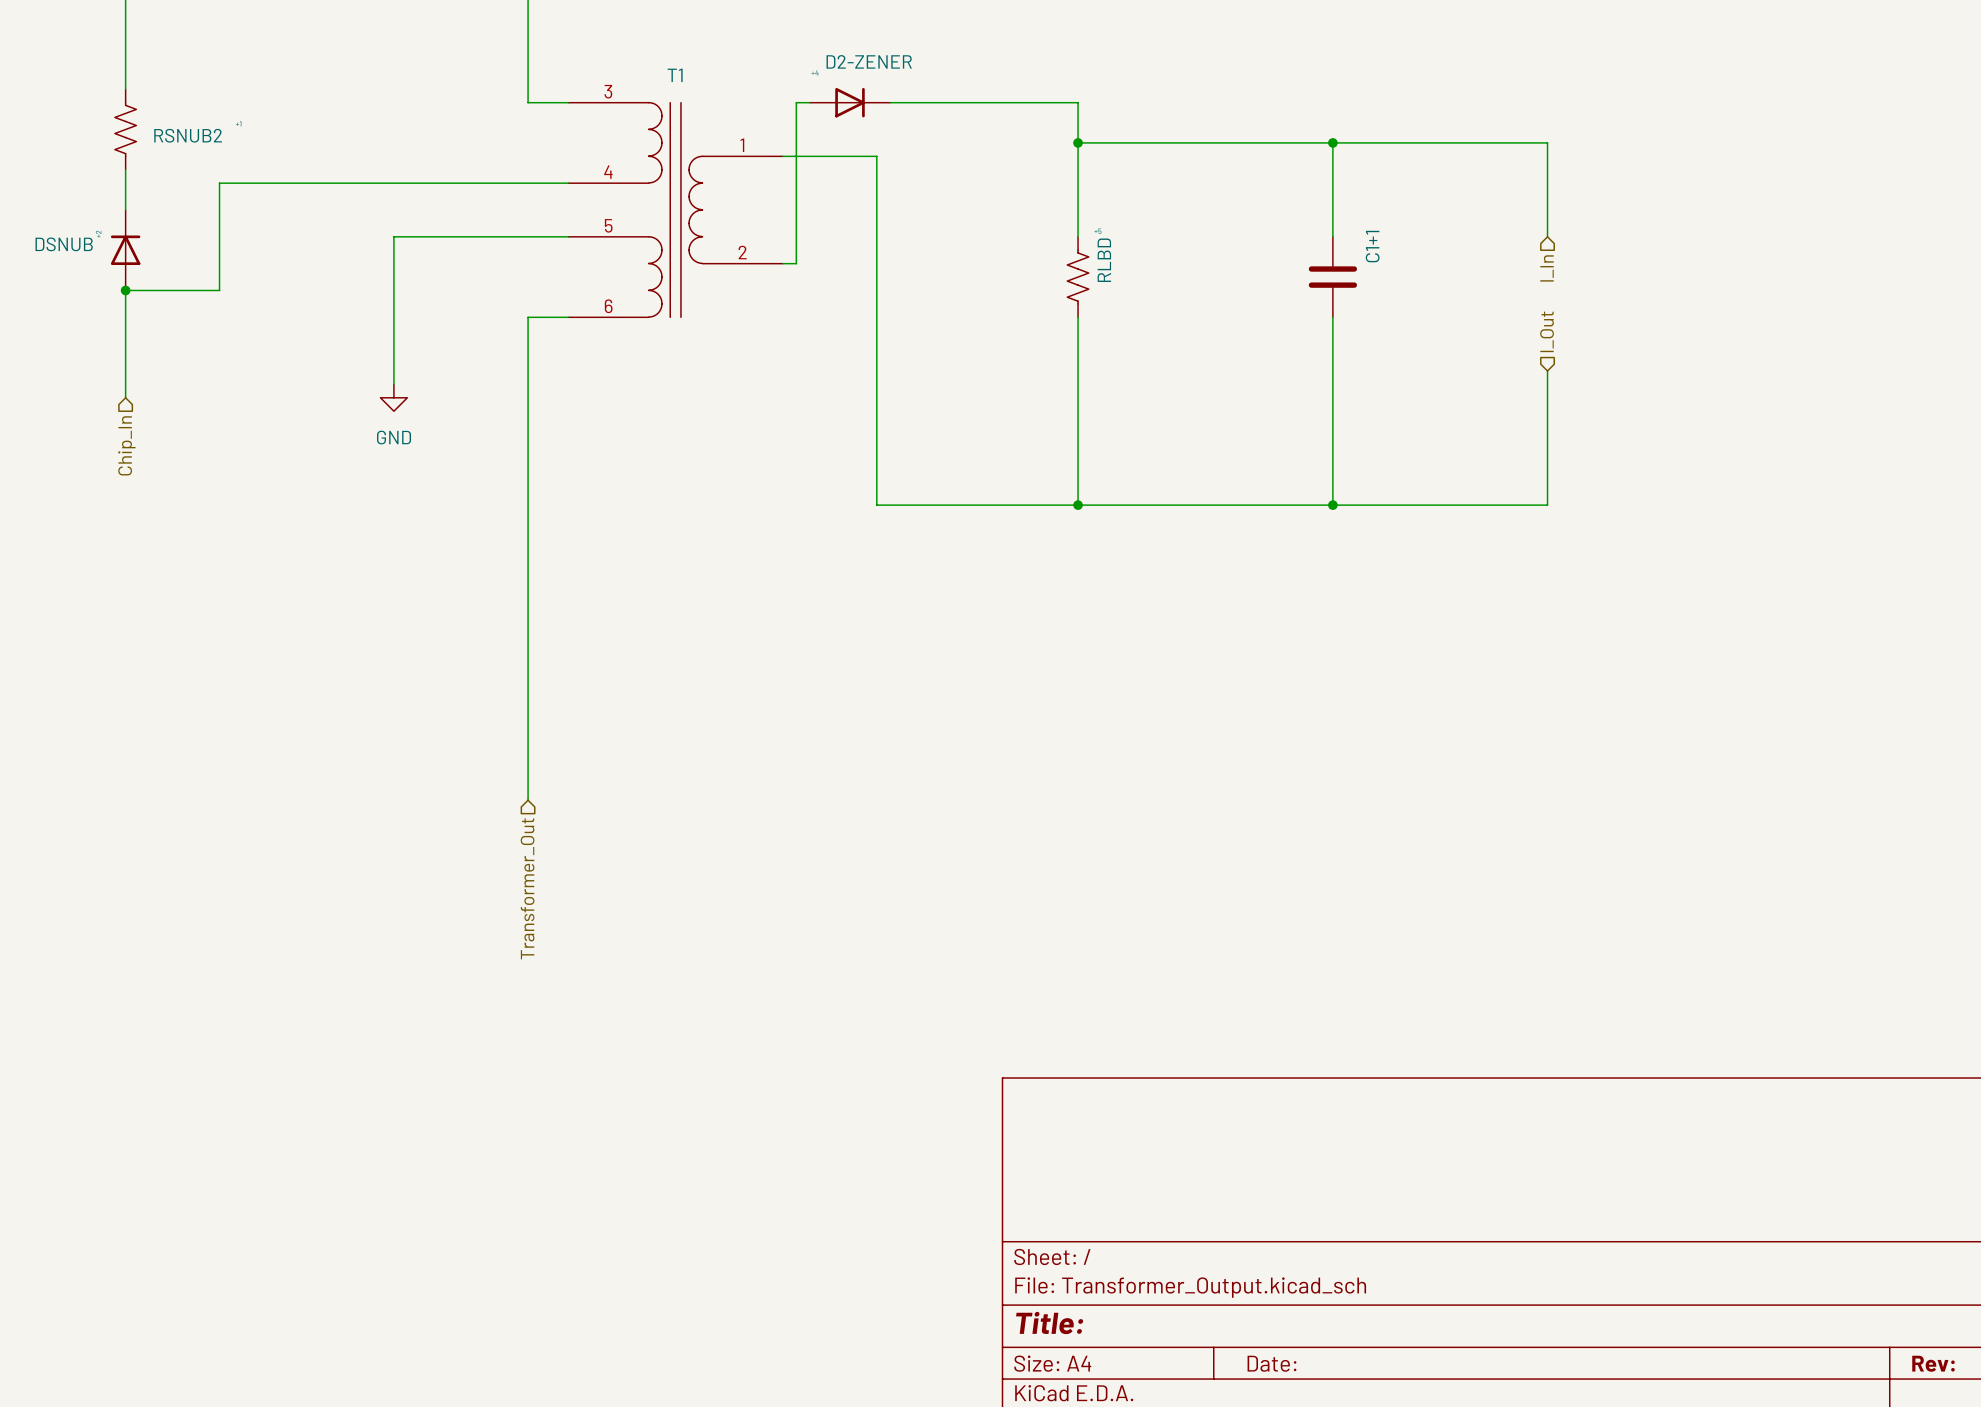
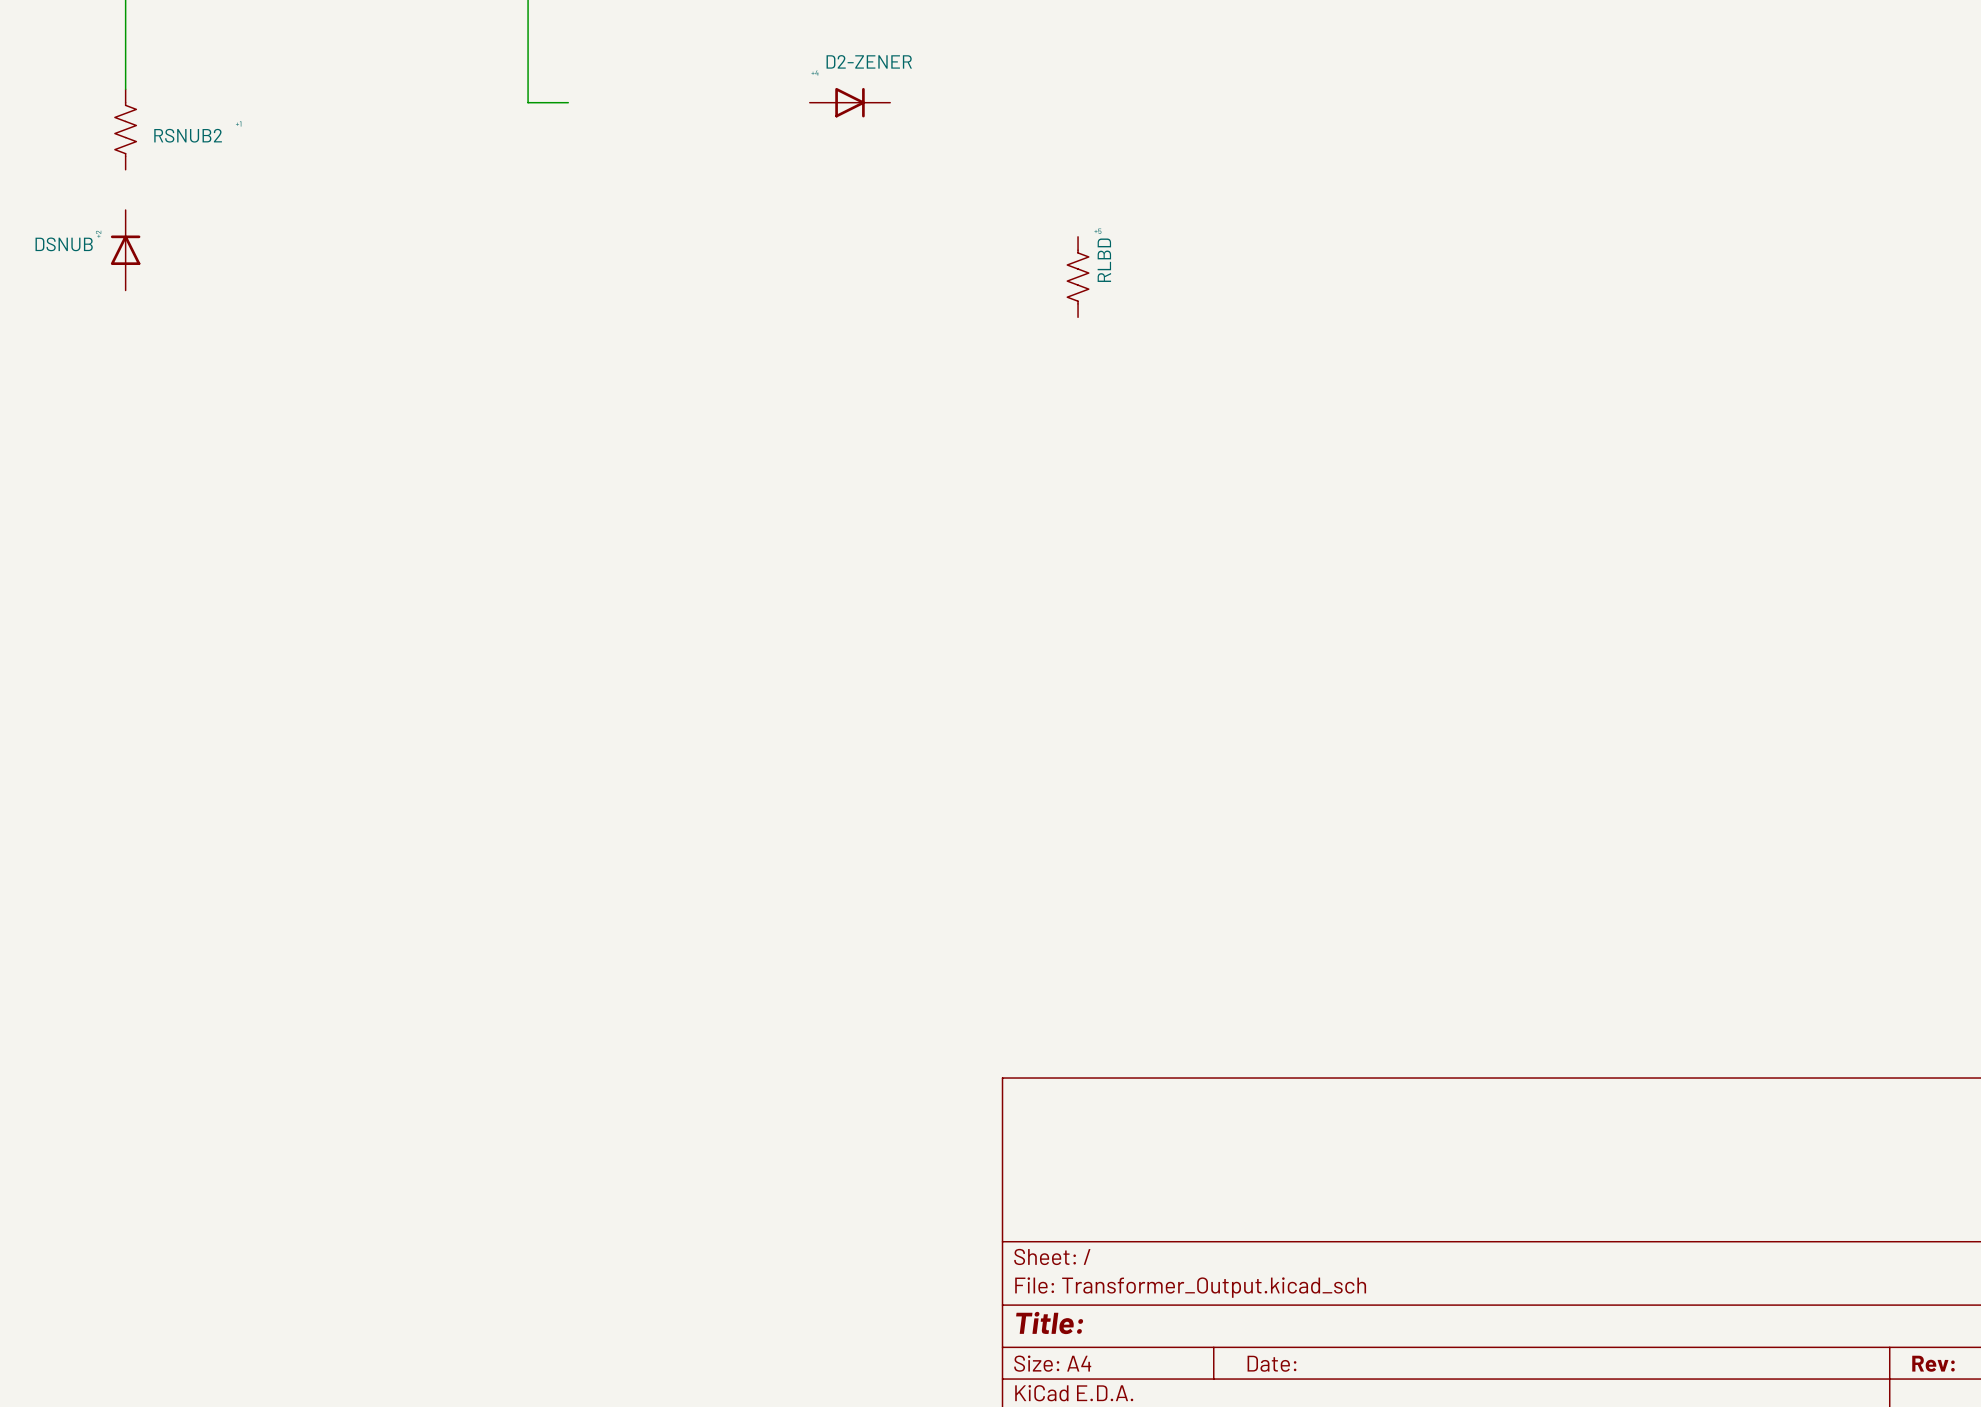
wire: (809, 102) (796, 102) (796, 263) (782, 263) -> none
wire: (890, 102) (1078, 102) (1078, 236) -> none
wire: (1078, 142) (1547, 142) (1547, 236) -> none
junction: (1078, 142) -> none
wire: (1332, 142) (1332, 236) -> none
junction: (1332, 142) -> none
wire: (782, 156) (876, 156) (876, 505) (1547, 505) (1547, 370) -> none
wire: (125, 169) (125, 210) -> none
wire: (568, 183) (219, 183) (219, 290) (125, 290) (125, 397) -> none
part: T1 (675, 210) -> none
wire: (568, 236) (393, 236) (393, 384) -> none
hierarchical label: I_In (1547, 268) -> none
C1+1: (1332, 277) -> none
junction: (125, 290) -> none
wire: (568, 317) (528, 317) (528, 800) -> none
wire: (1078, 317) (1078, 505) -> none
wire: (1332, 317) (1332, 505) -> none
hierarchical label: I_Out (1547, 331) -> none
power symbol: GND (393, 397) -> none
hierarchical label: Chip_In (126, 445) -> none
junction: (1078, 505) -> none
junction: (1332, 505) -> none
hierarchical label: Transformer_Out (527, 888) -> none

